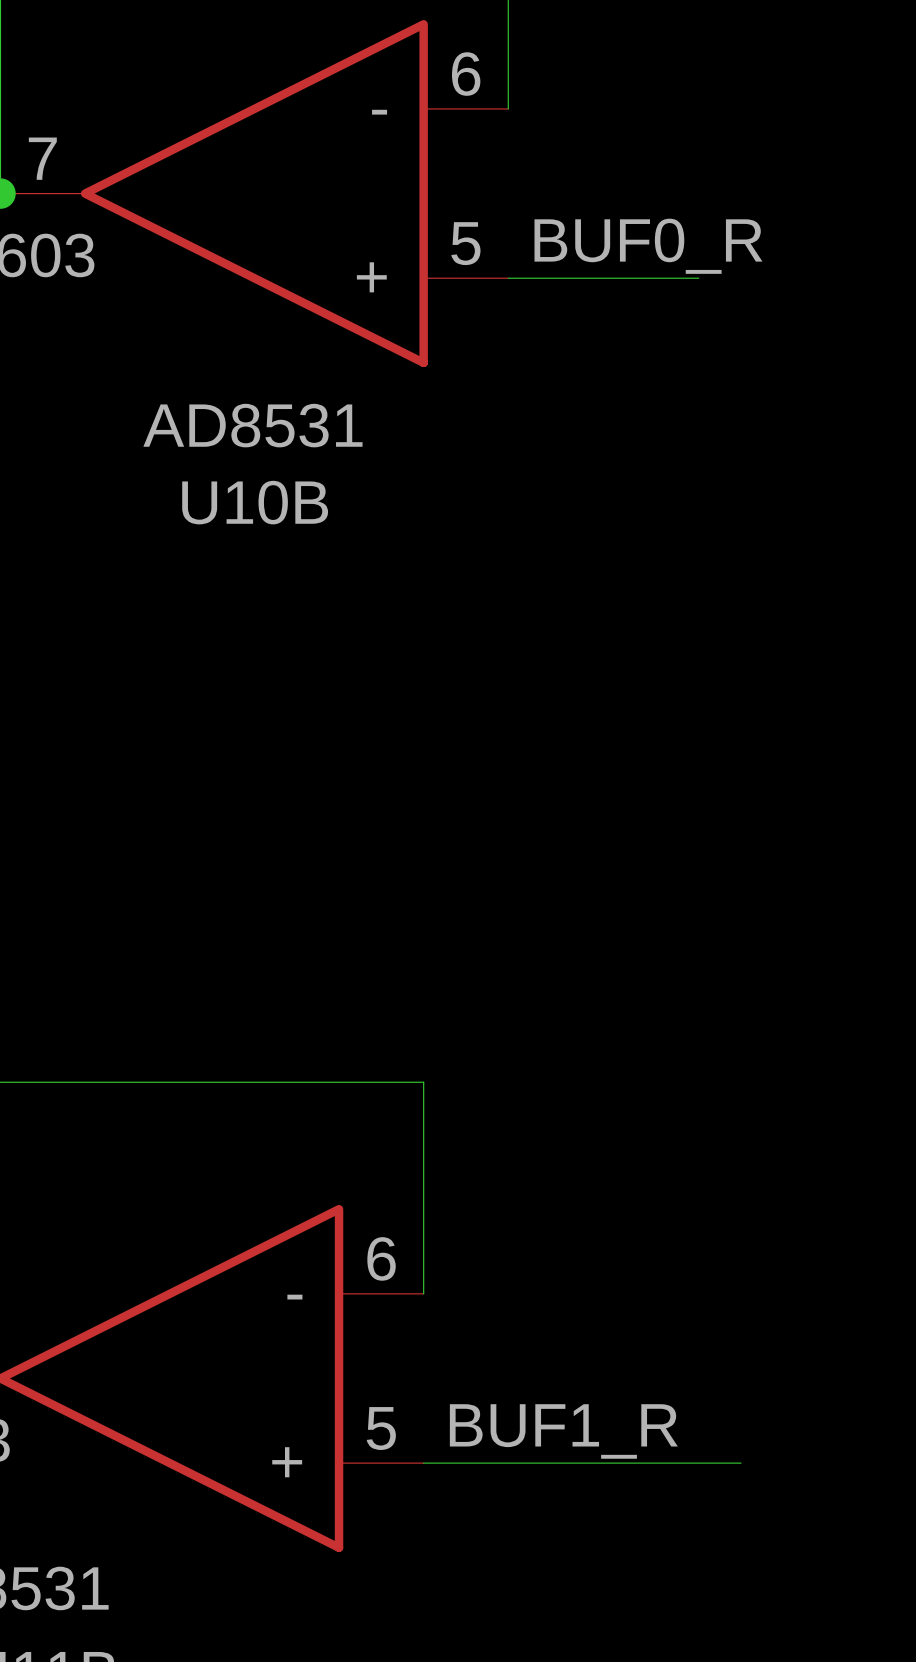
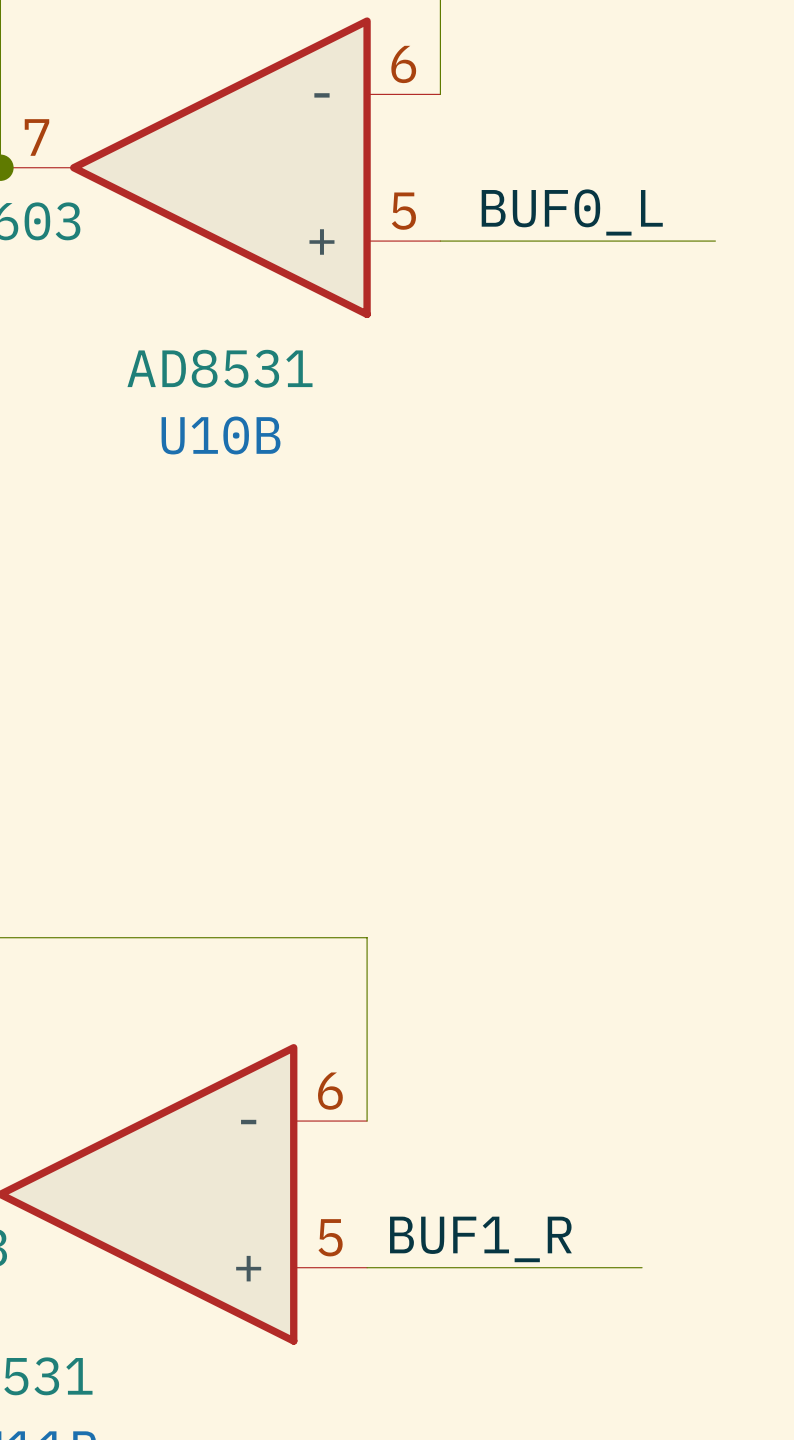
label: BUF0_R (648, 246) -> BUF0_L (572, 212)
wire: none -> (605, 241) (715, 241)

